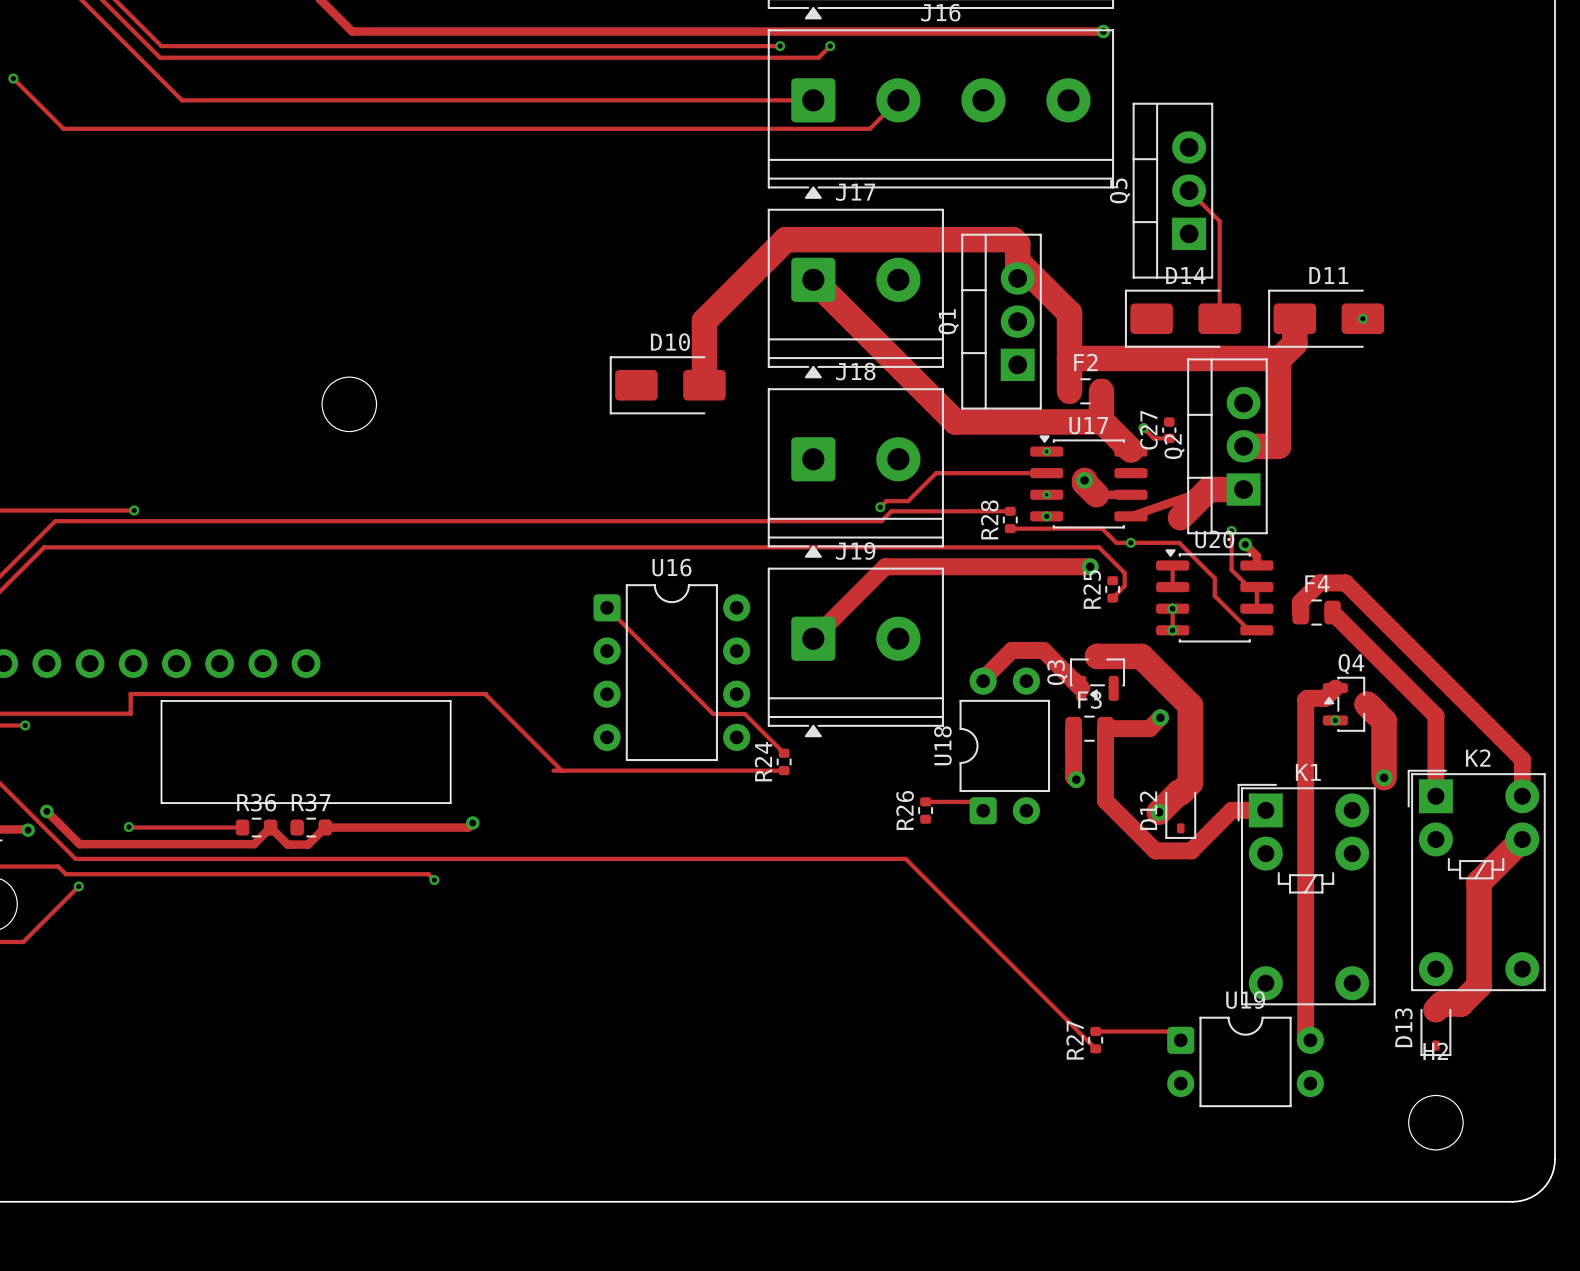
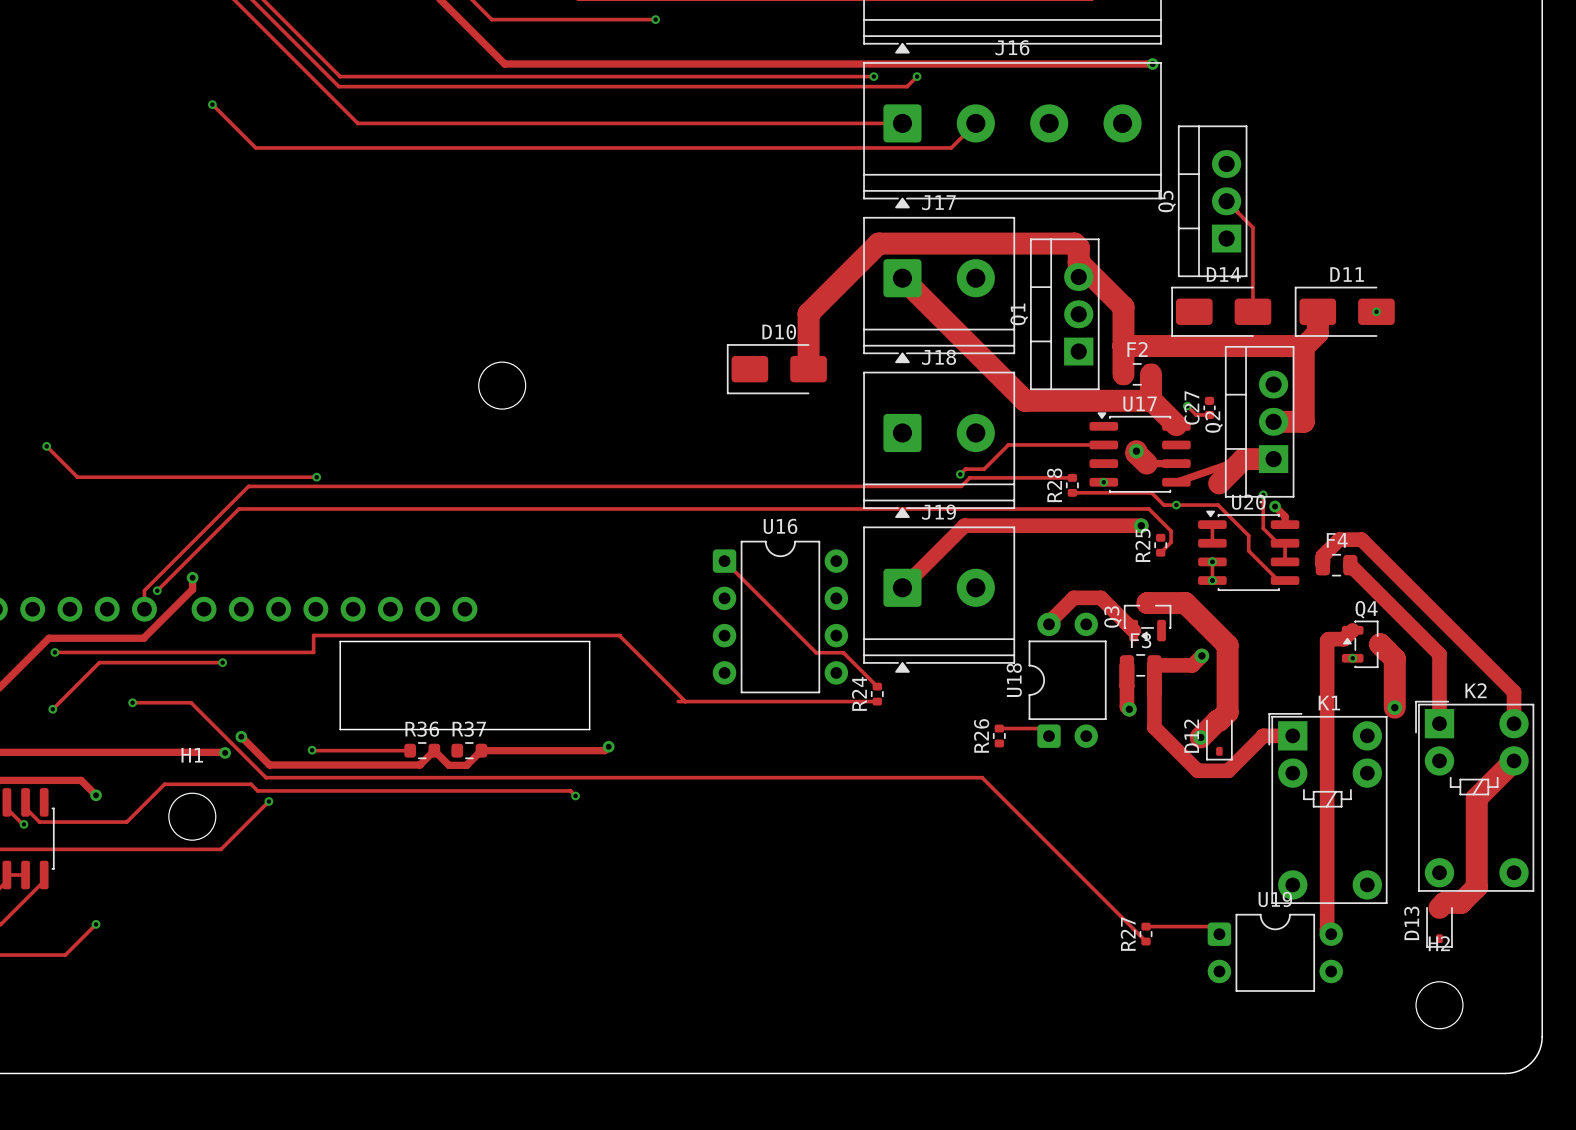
via: (1046, 451) -> none
via: (1046, 494) -> none

